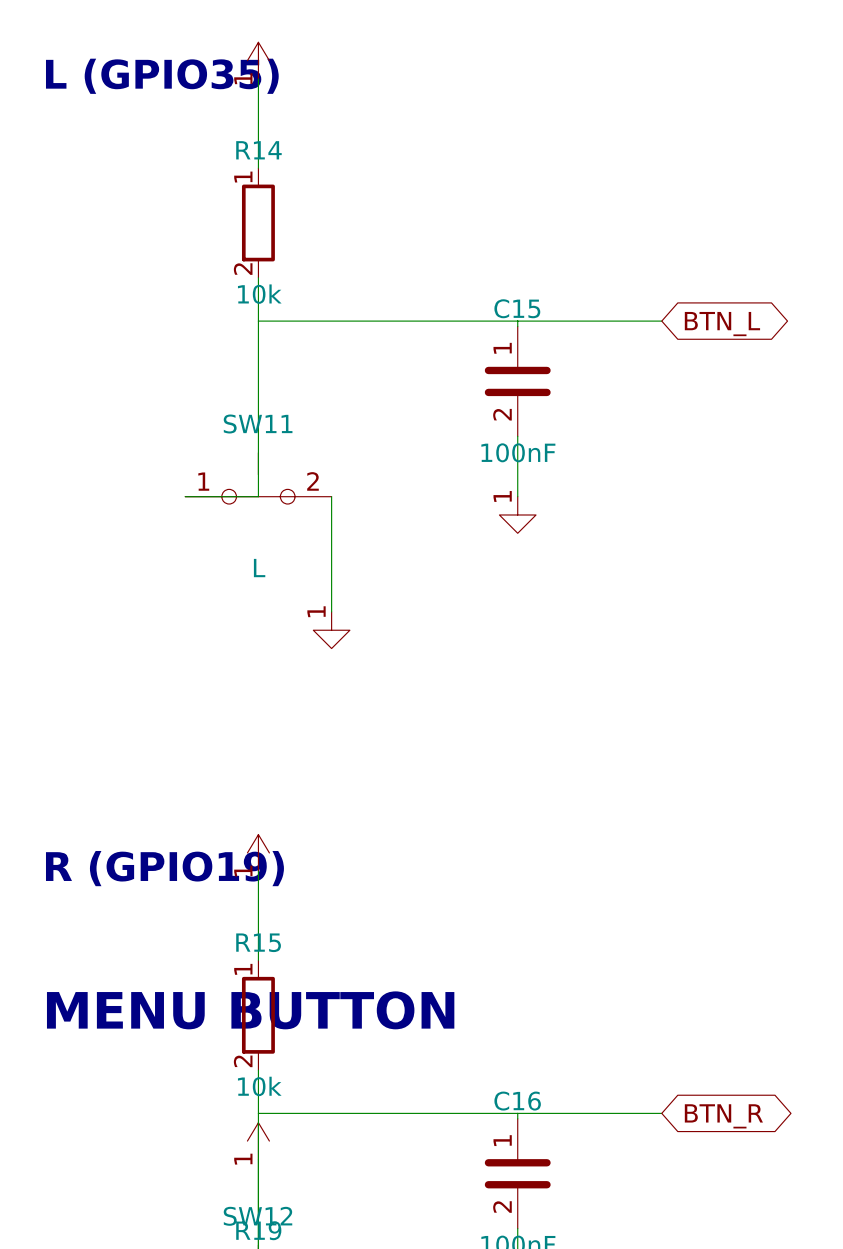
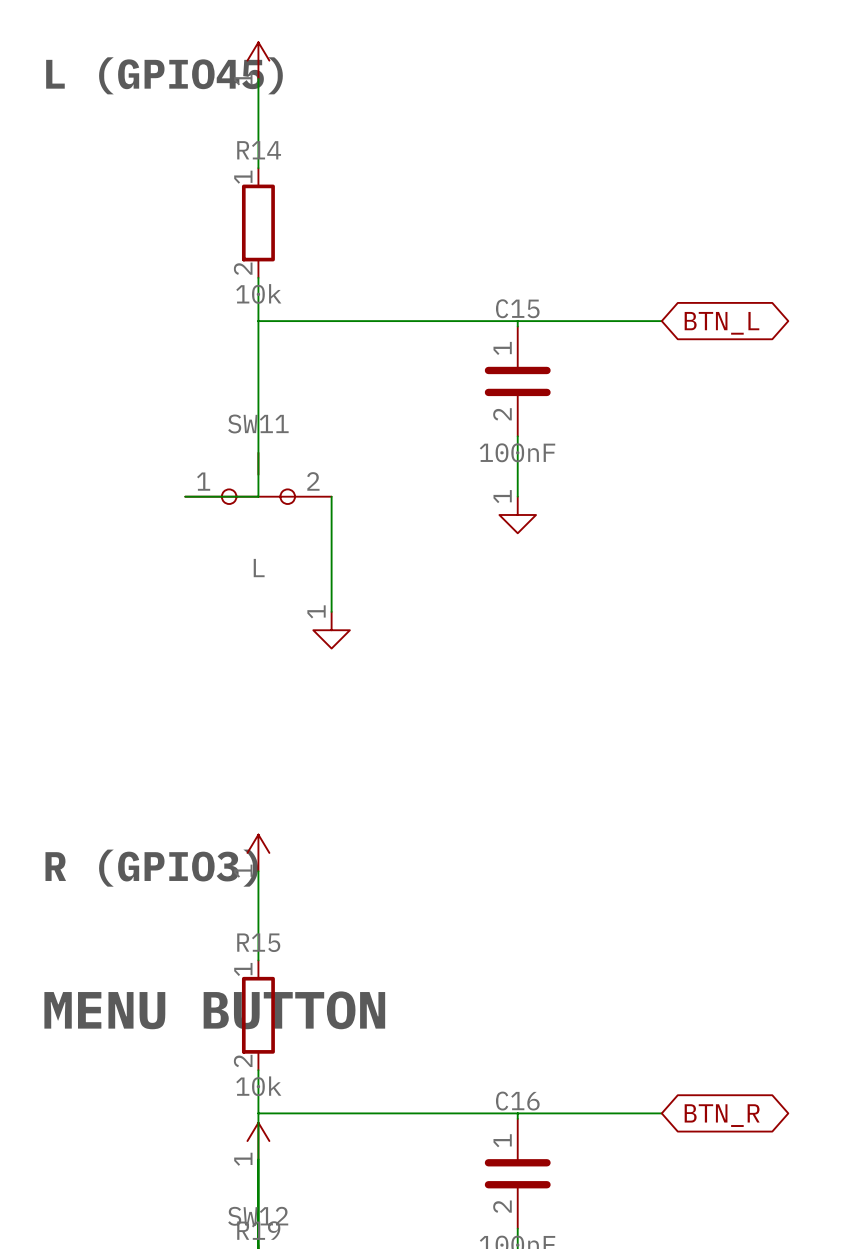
text: L (GPIO35) (162, 76) -> L (GPIO45) (164, 75)
text: R (GPIO19) (164, 868) -> R (GPIO3) (151, 868)

